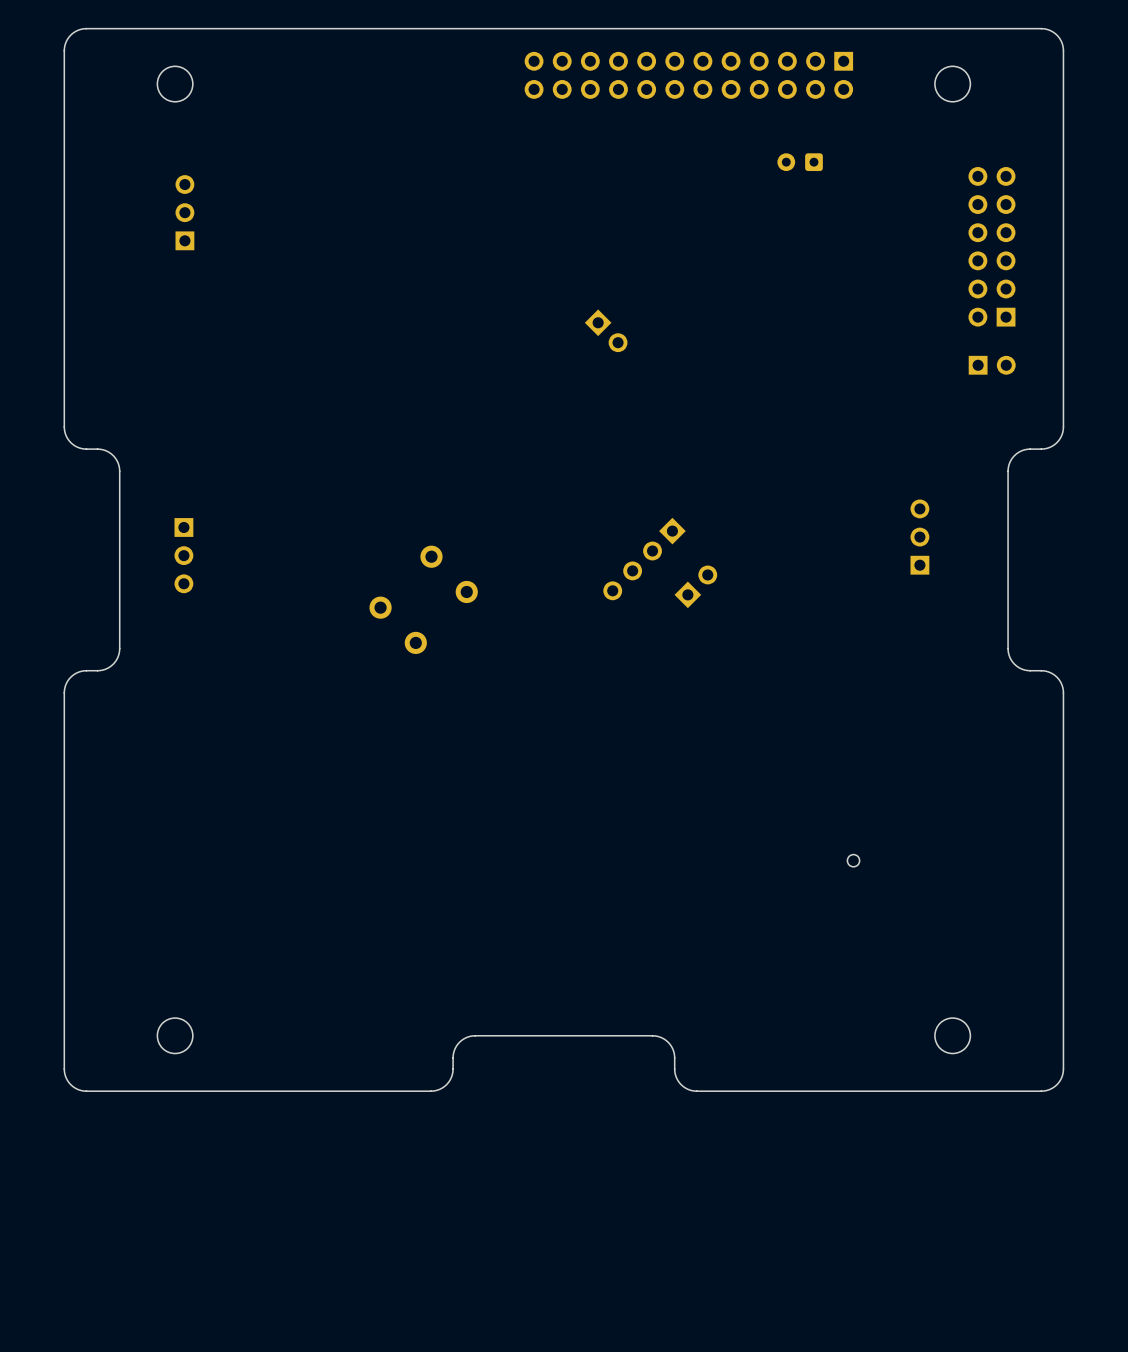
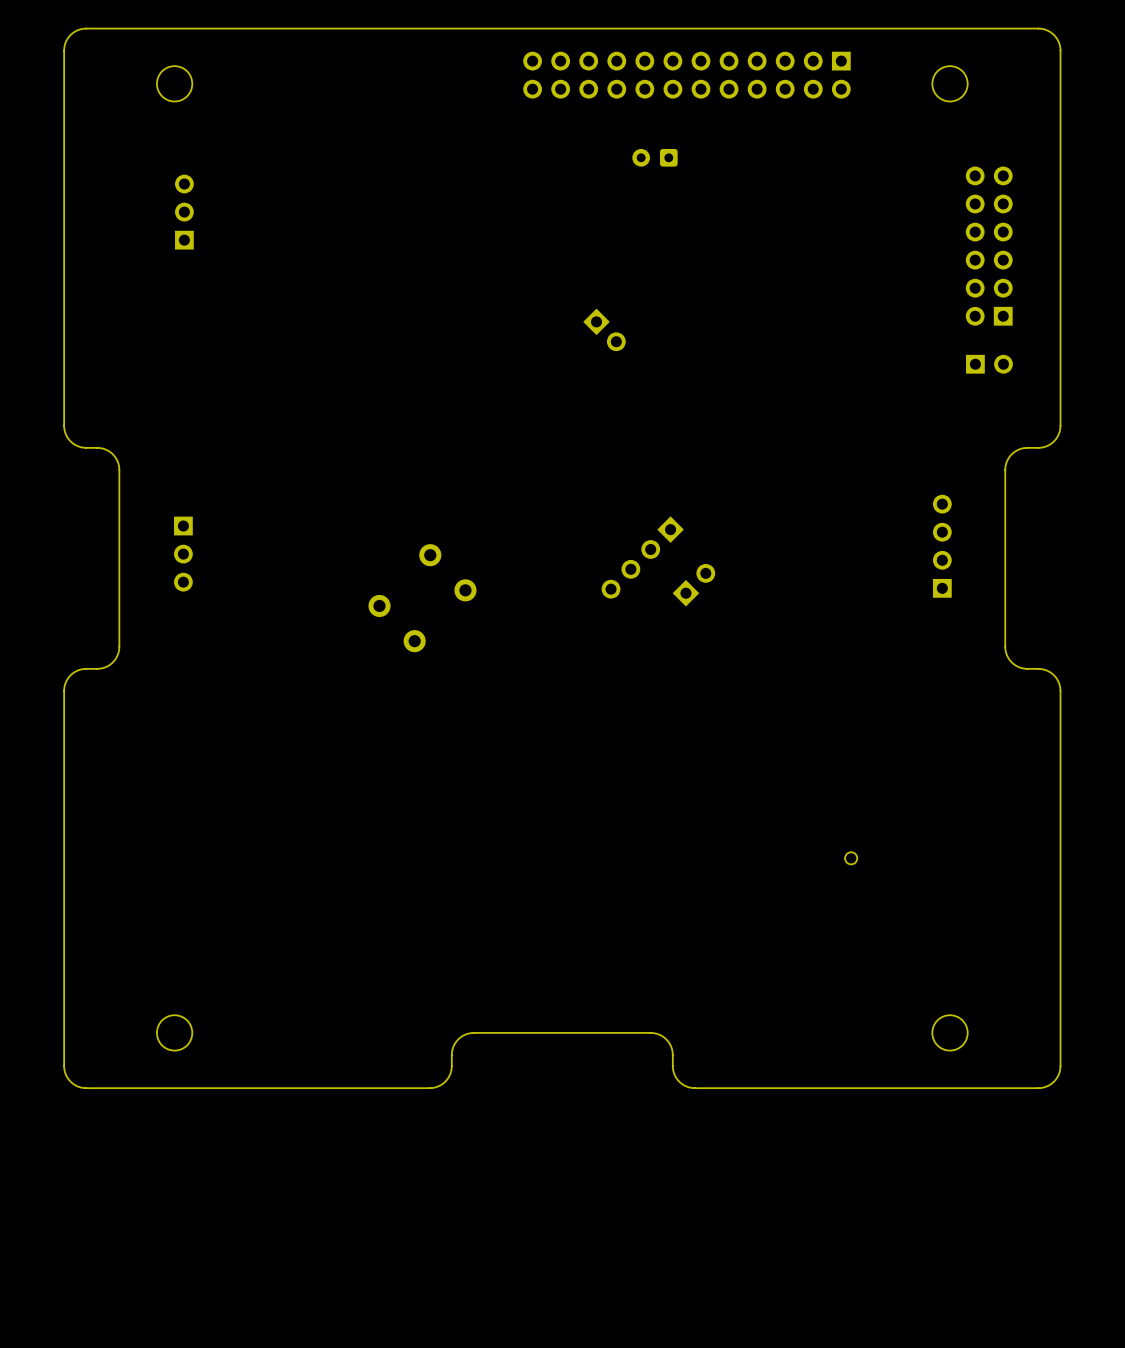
part position: (800, 162) -> (655, 157)
part: (919, 537) -> none
part: none -> (942, 546)

